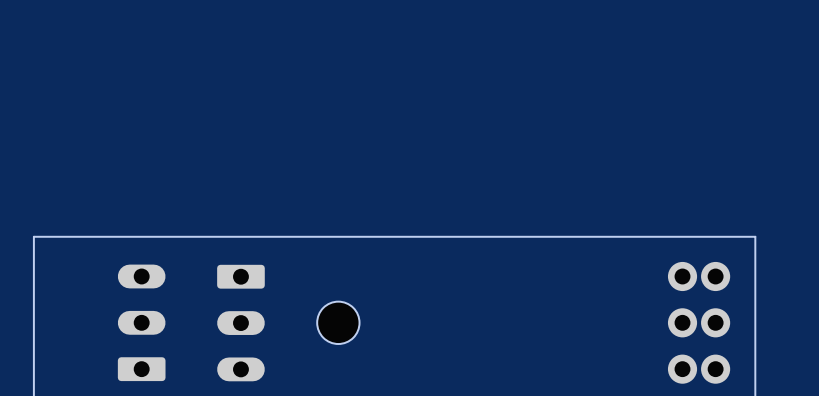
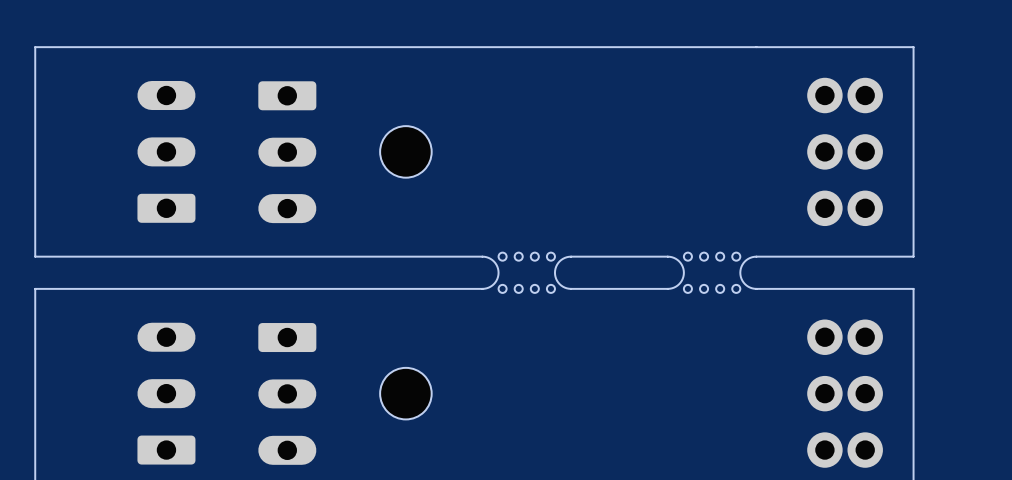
part: none -> (166, 151)
part: none -> (287, 152)
part: none -> (405, 151)
part: none -> (845, 151)
drawing: none -> [481, 251, 573, 294]
drawing: none -> [666, 251, 758, 294]
board edge: none -> (667, 256) (571, 256)
board edge: none -> (756, 256) (913, 256) (913, 47) (35, 47) (35, 256) (482, 256)
board edge: (474, 236) (401, 236) -> none
board edge: (626, 236) (553, 236) -> none

